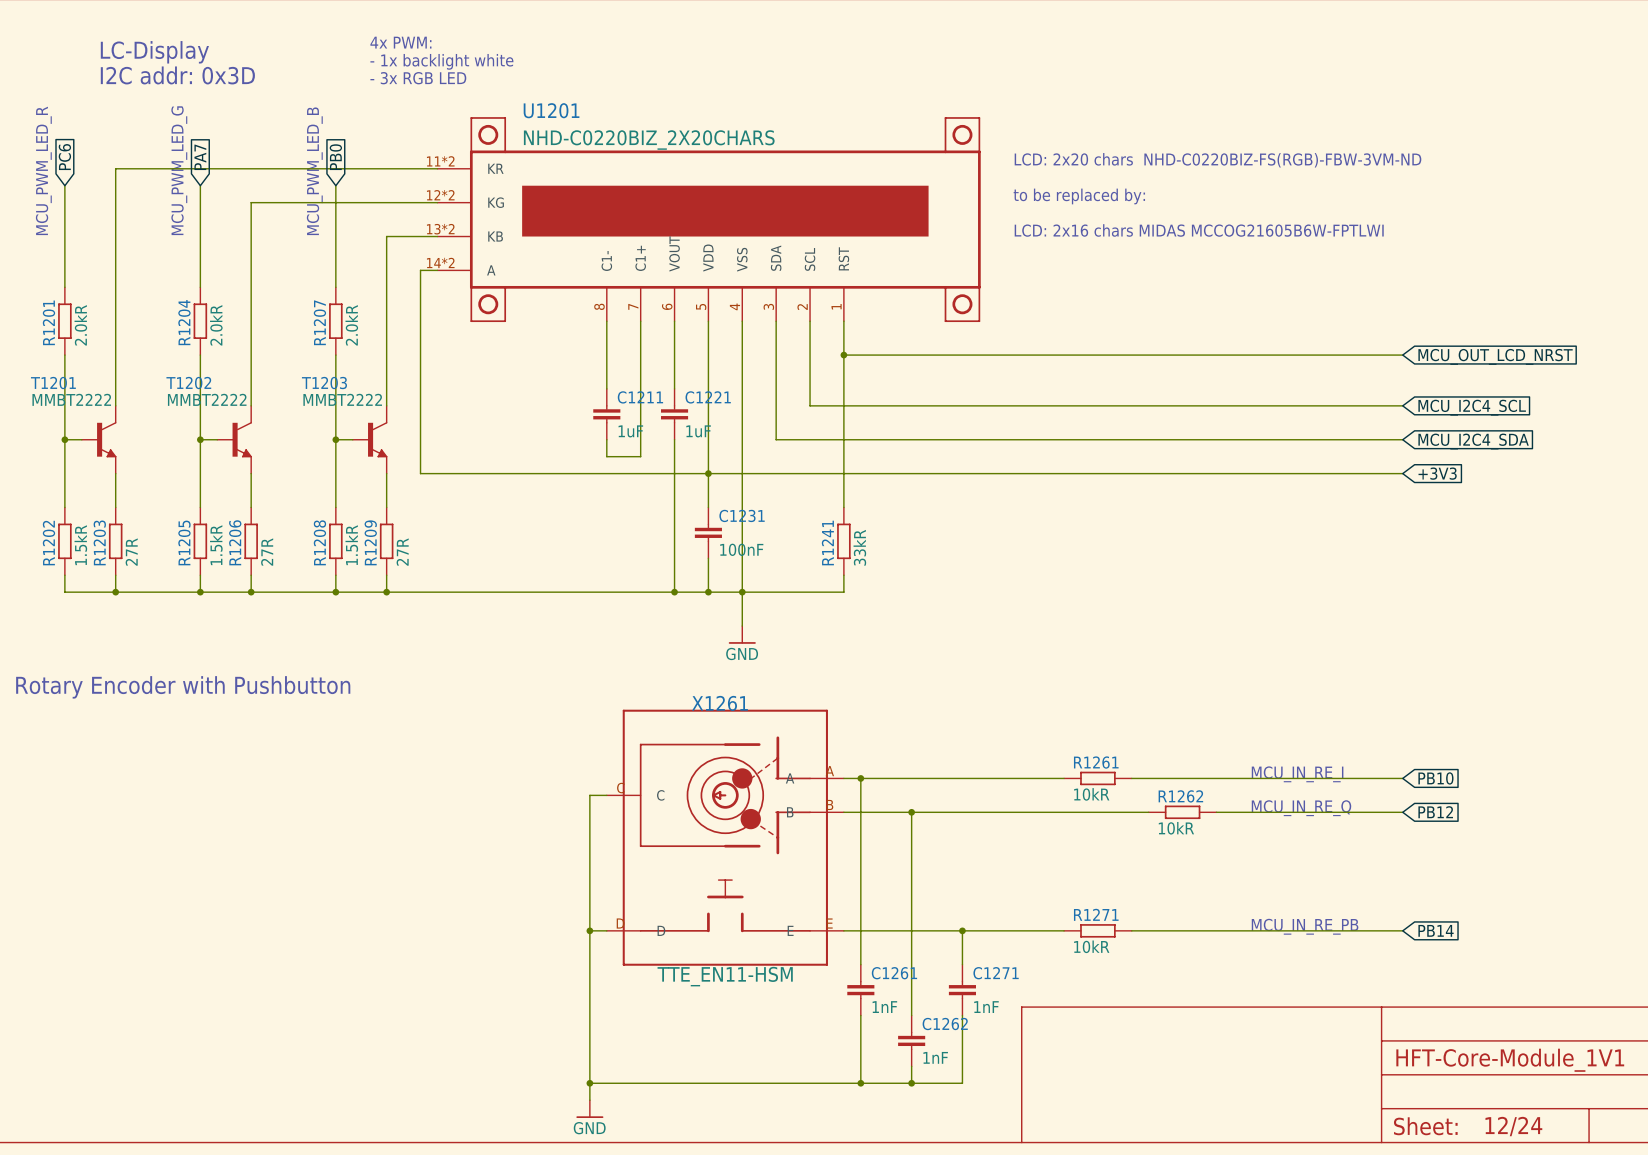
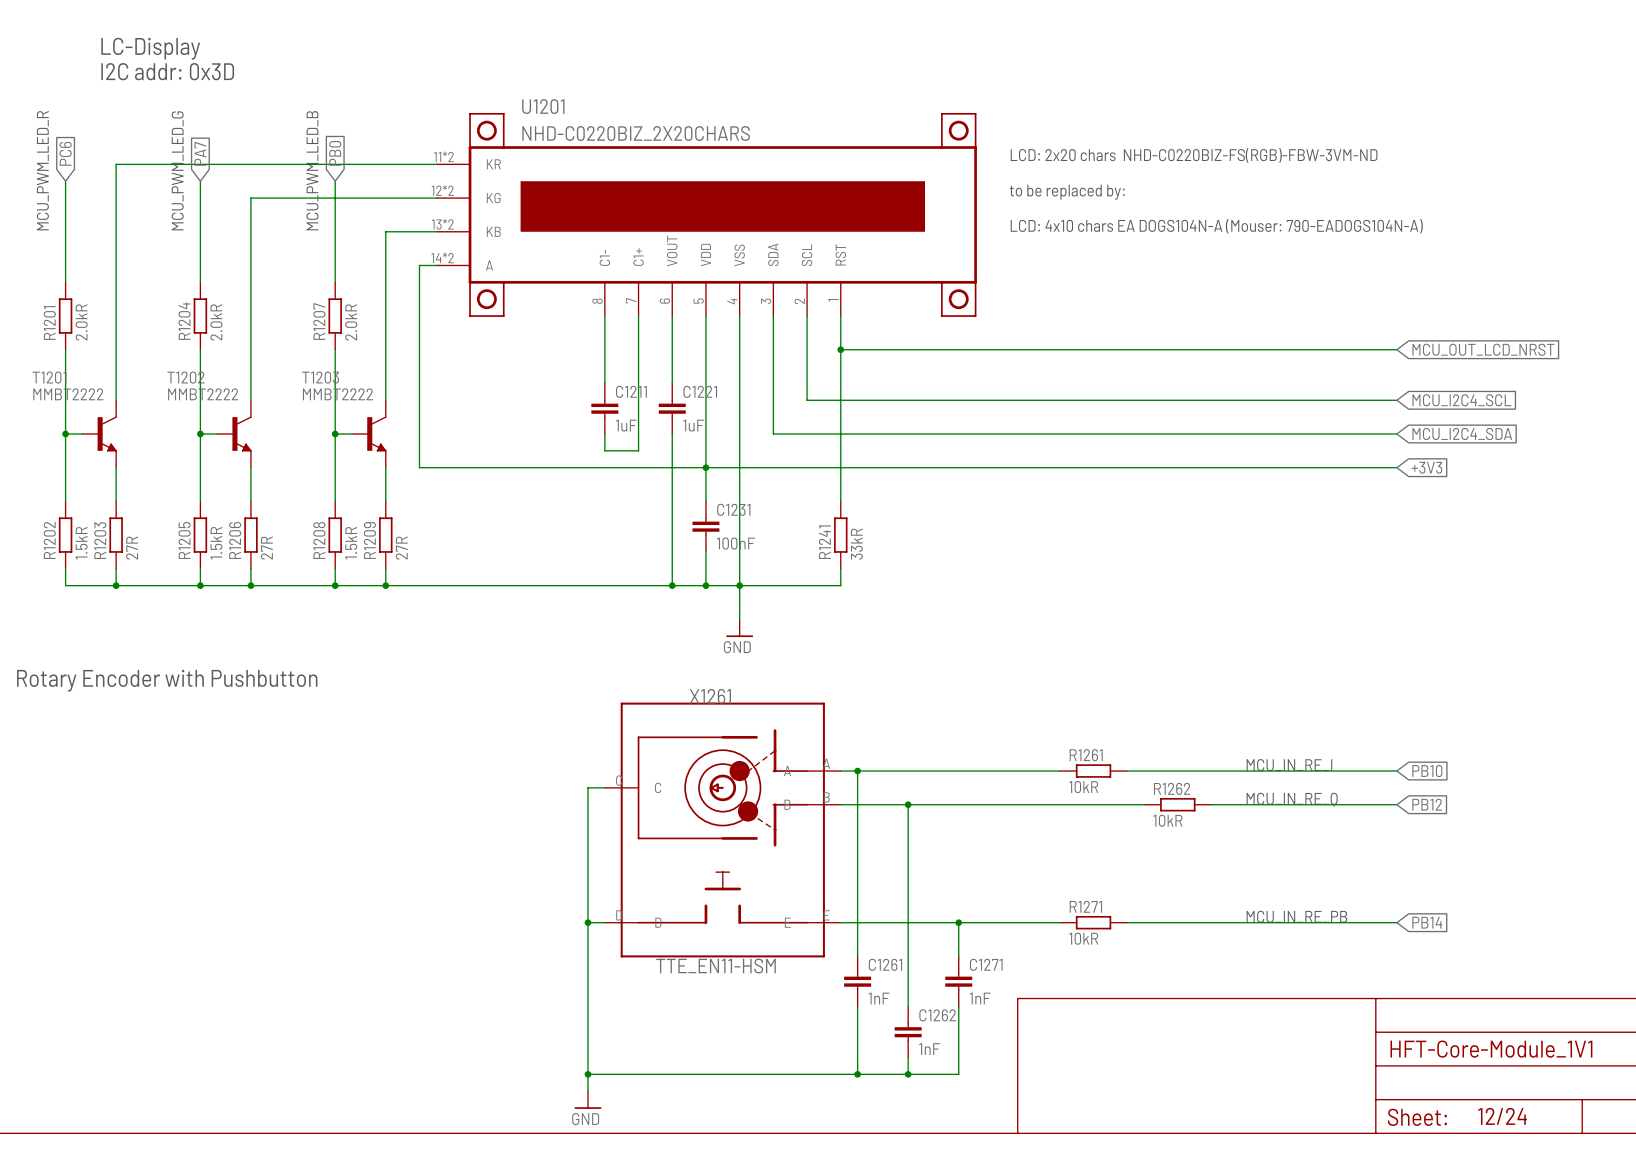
text: 4x PWM: (400, 42) -> none
text: - 1x backlight white (441, 61) -> none
text: - 3x RGB LED (418, 78) -> none
text: LCD: 2x16 chars MIDAS MCCOG21605B6W-FPTLWI (1199, 230) -> LCD: 4x10 chars EA DOGS104N-A (Mouser: 790-EADOGS104N-A) (1216, 226)

